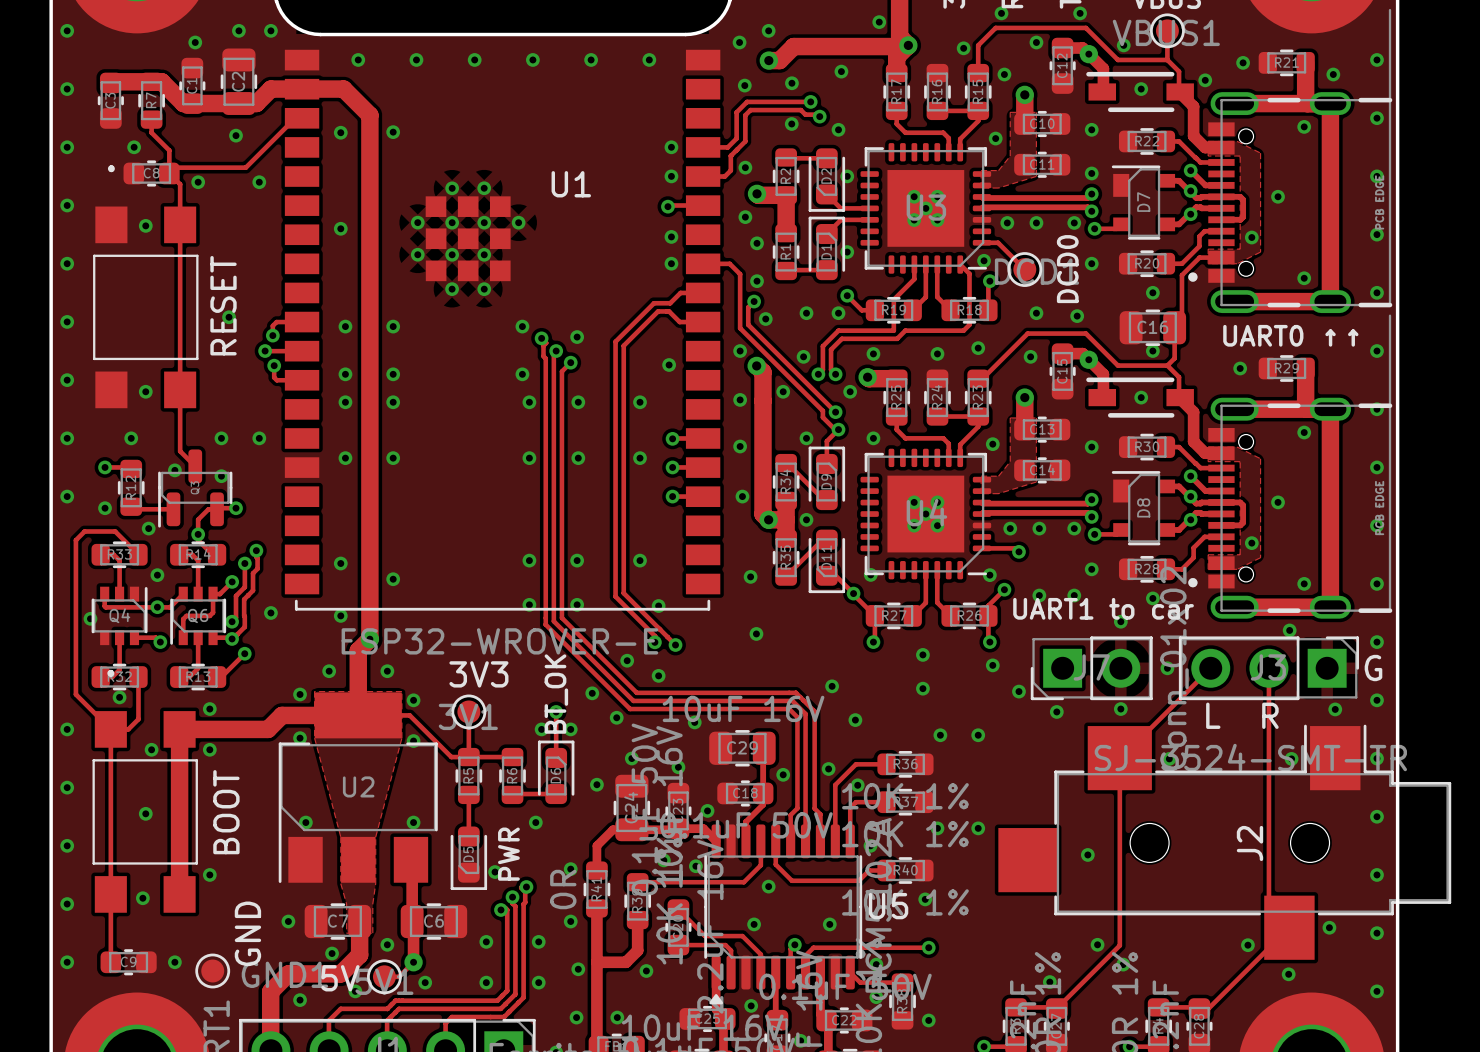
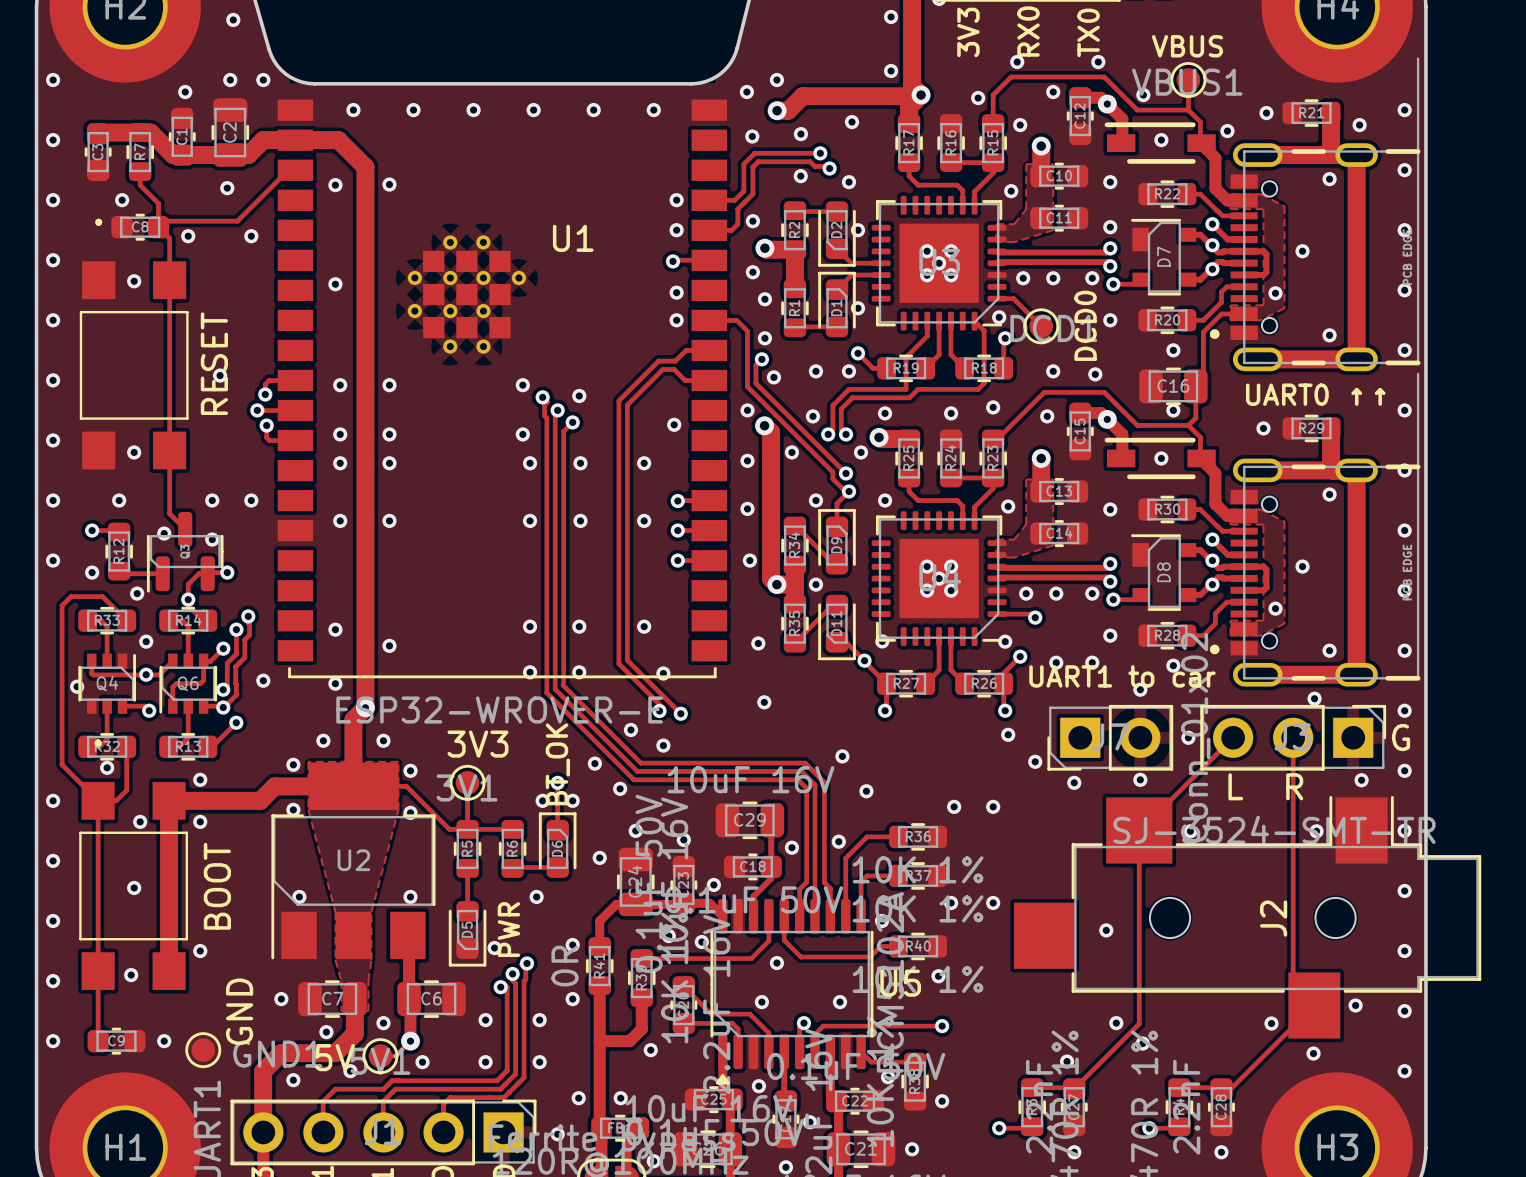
via: (922, 654) -> none
via: (922, 688) -> none
via: (694, 722) -> none
via: (857, 785) -> none
via: (876, 964) -> none
via: (578, 969) -> none

